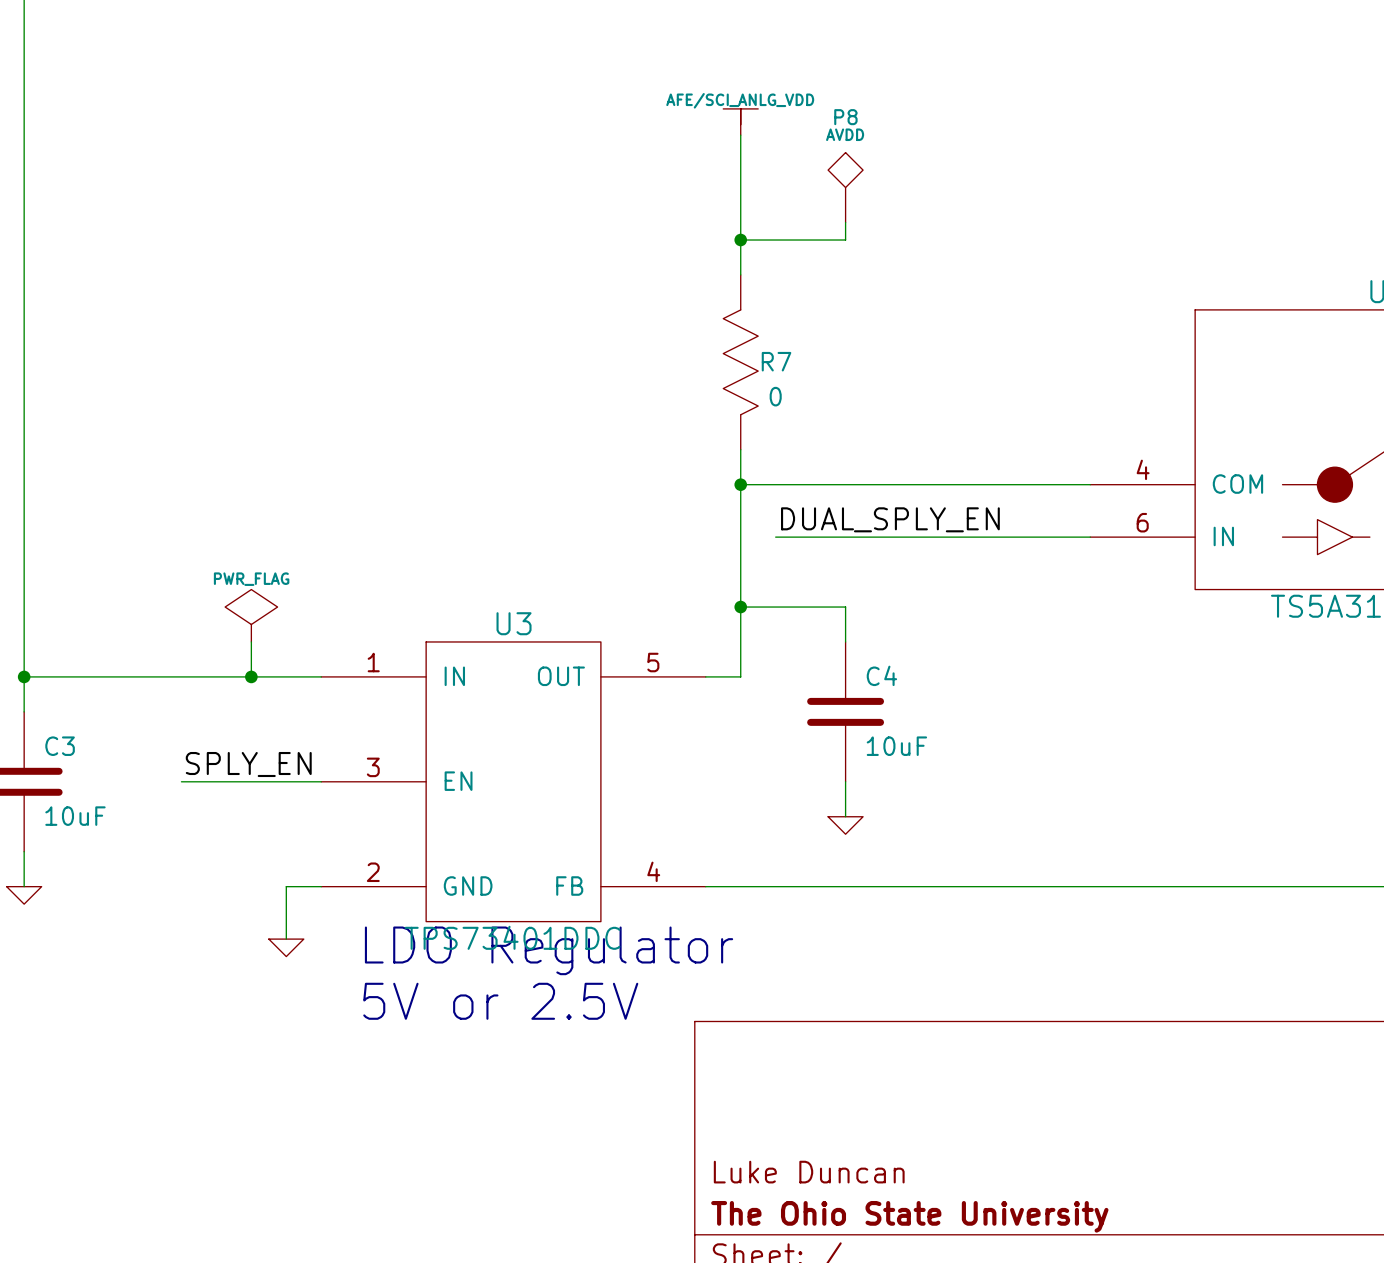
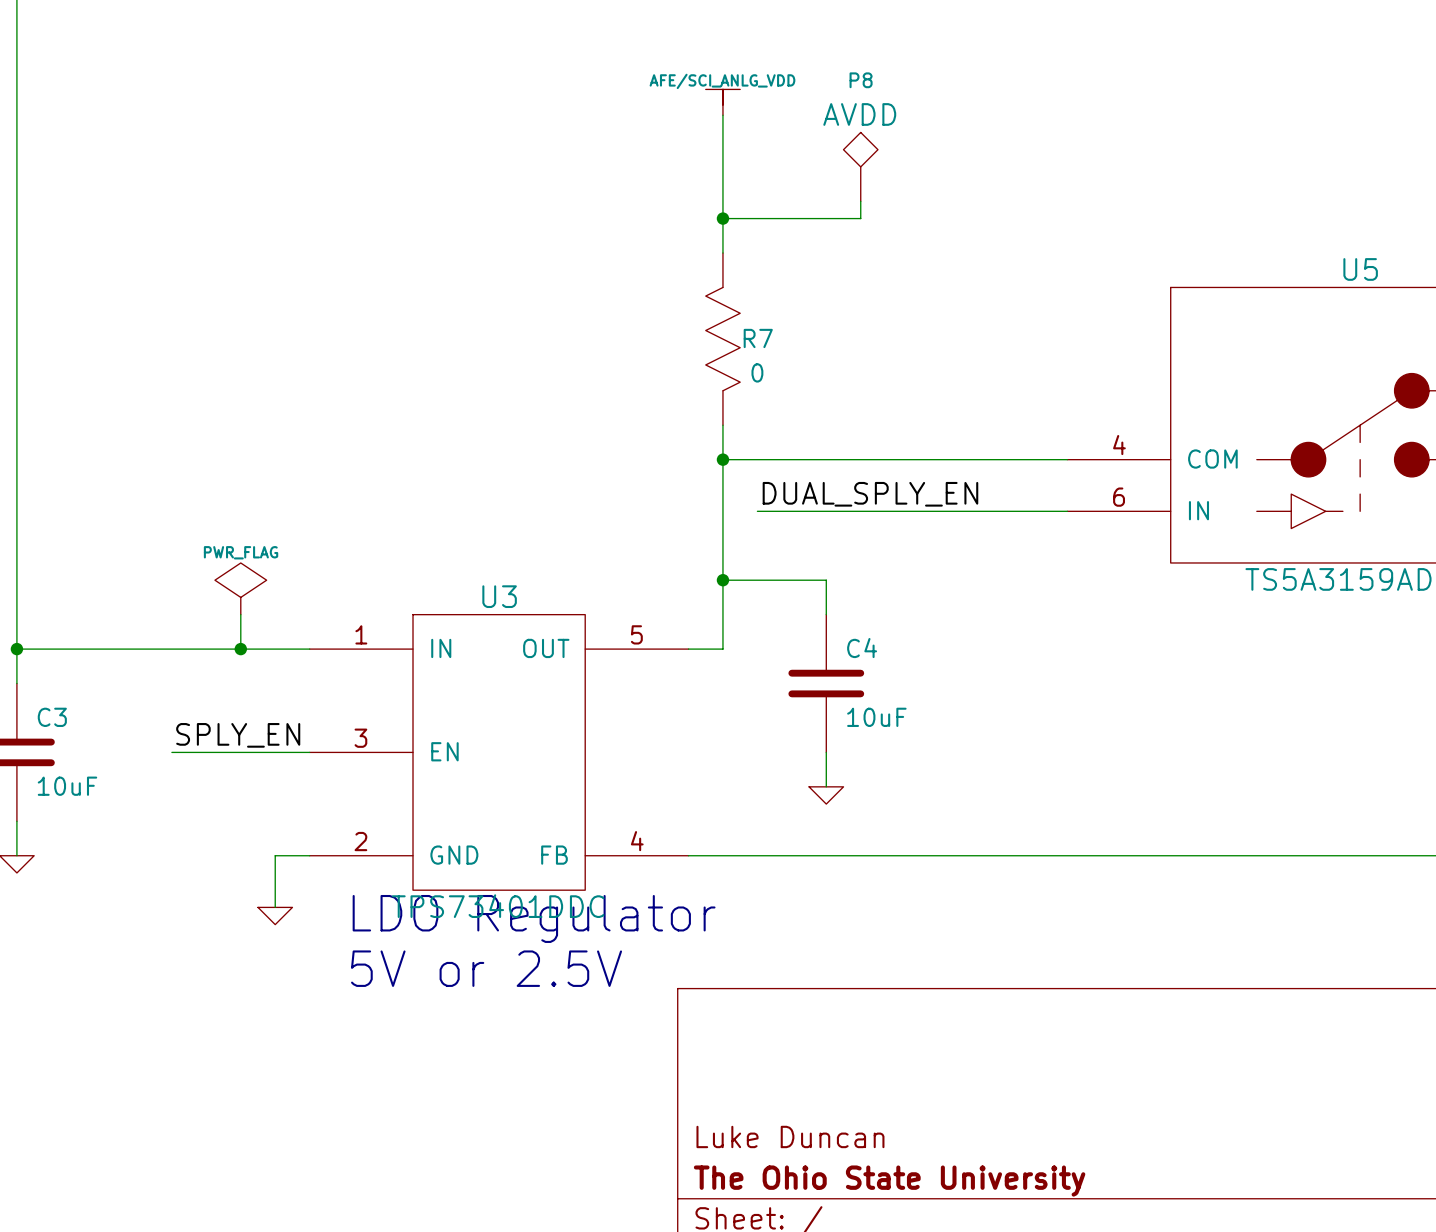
P8 name position: P8 (845, 117) -> P8 (861, 80)
P8 value: AVDD (845, 134) -> none
P8 text: none -> AVDD (859, 114)
P8 position: (845, 187) -> (860, 166)
wire: (845, 222) (845, 240) -> (860, 201) (860, 218) (826, 218)

